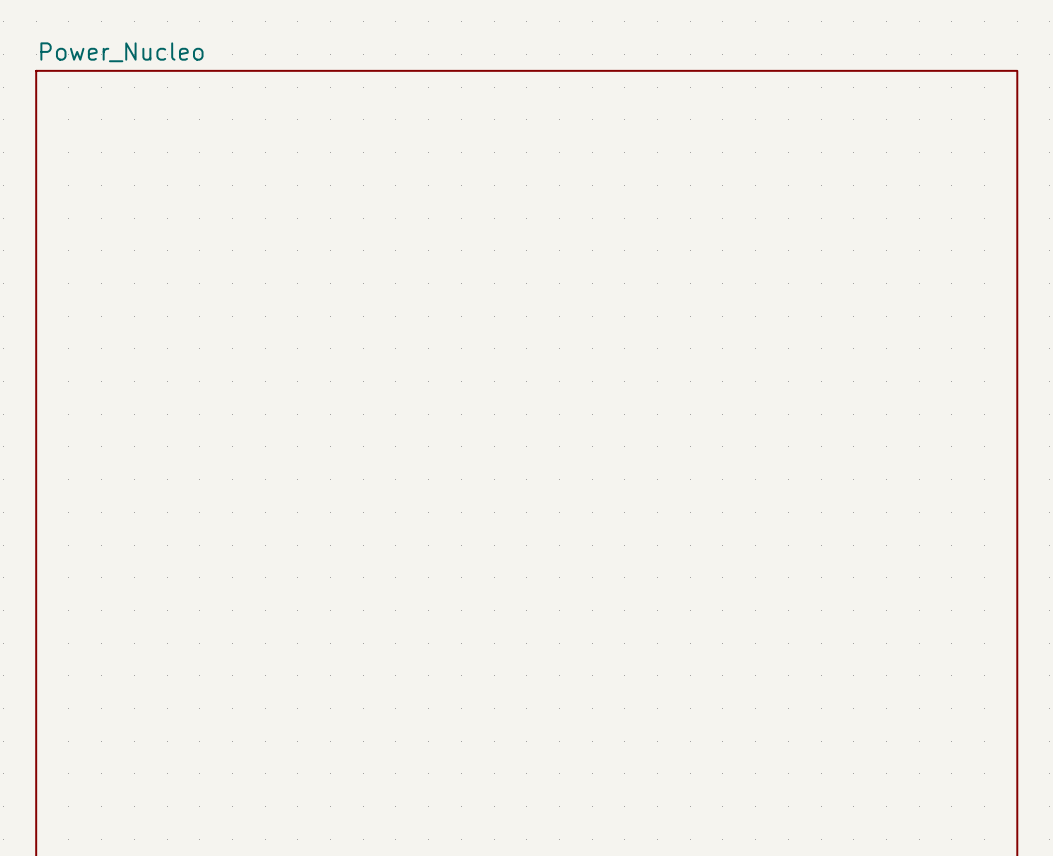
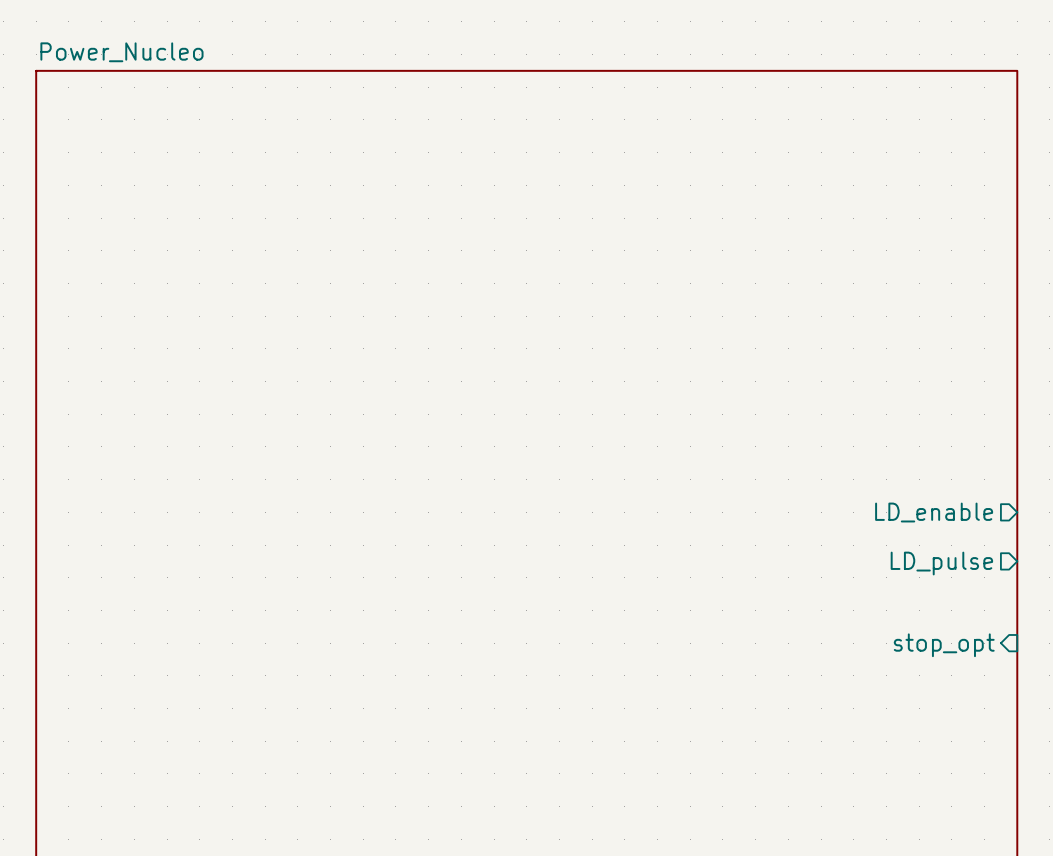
sheet pin: none -> LD_enable (934, 512)
sheet pin: none -> LD_pulse (941, 563)
sheet pin: none -> stop_opt (944, 645)

